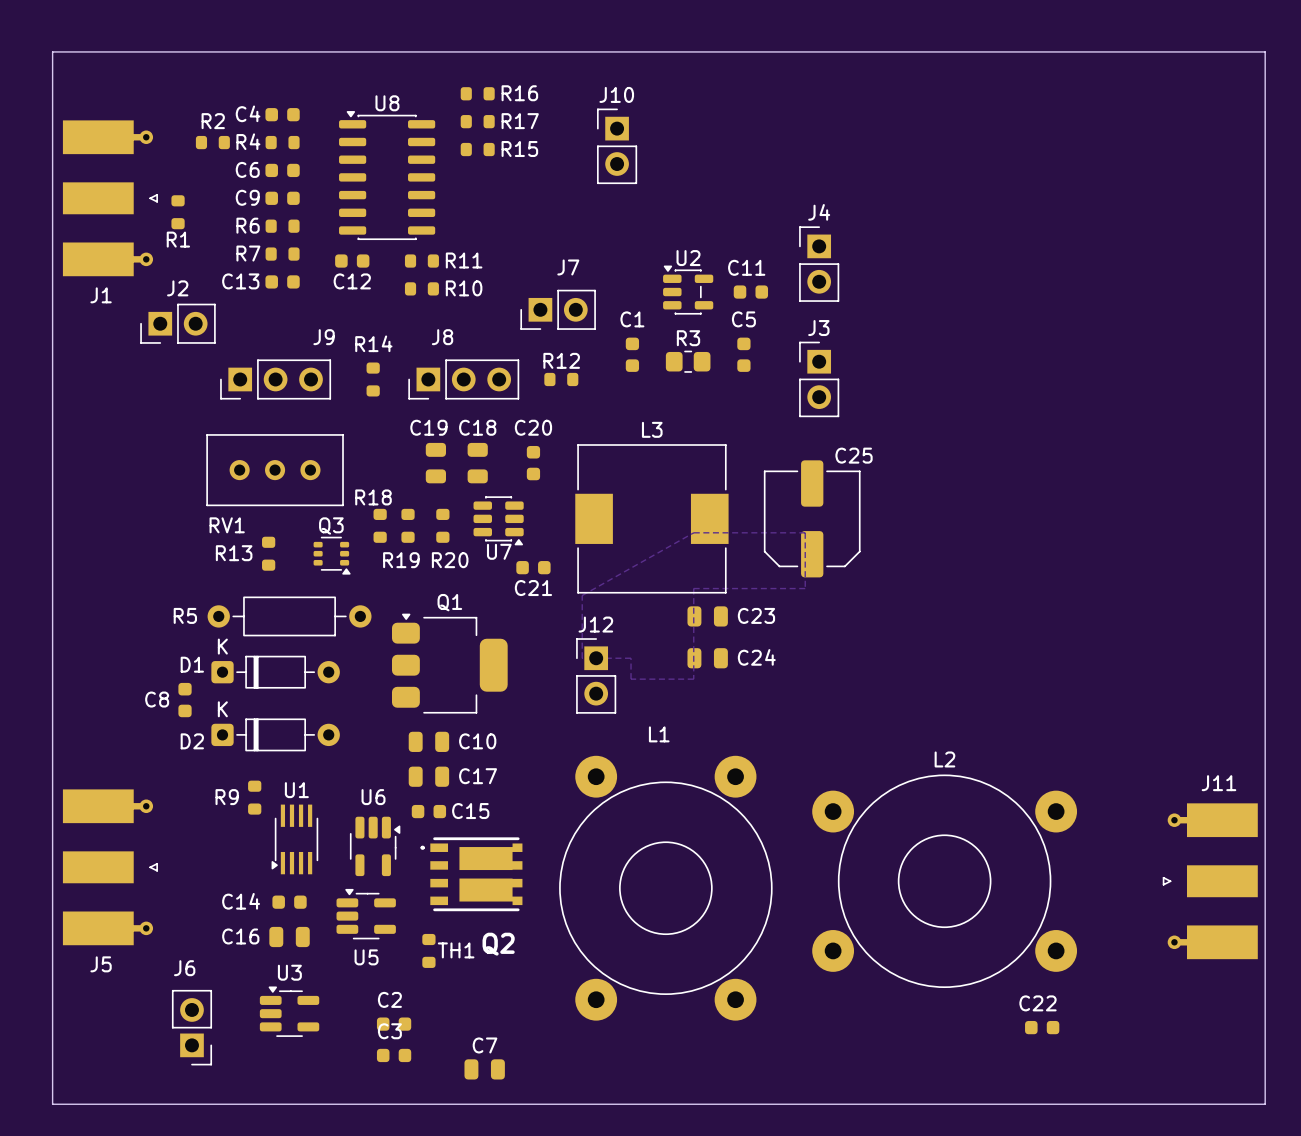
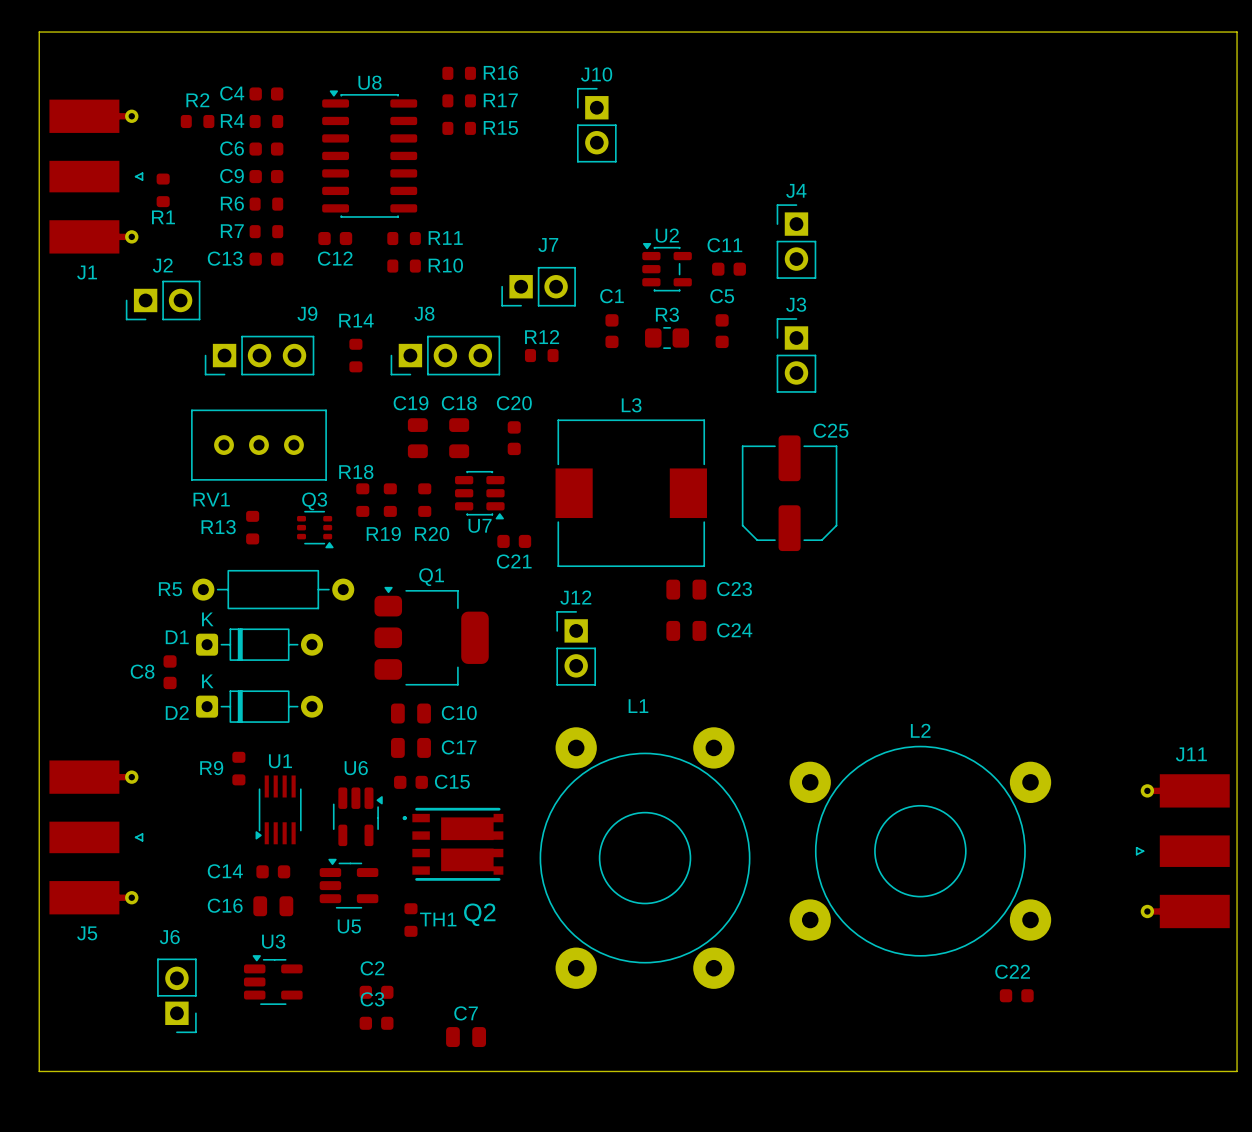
zone outline: (693, 532) (582, 595) (582, 658) (631, 658) (631, 679) (693, 679) (693, 588) (805, 588) (805, 532) (693, 532) -> none

